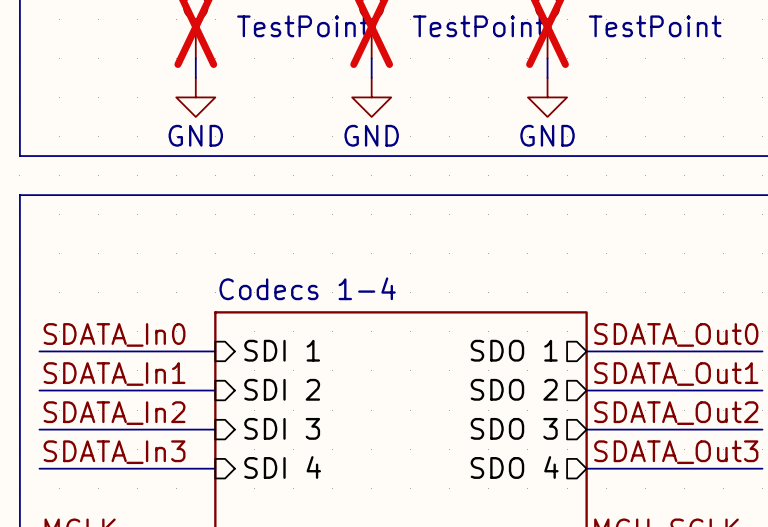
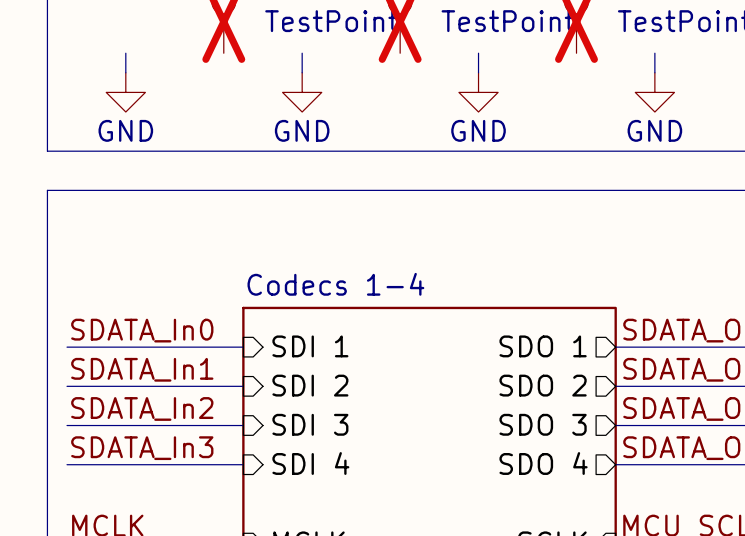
wire: none -> (125, 53) (125, 72)
wire: (195, 58) (195, 77) -> (302, 53) (302, 72)
wire: (371, 58) (371, 77) -> (478, 53) (478, 72)
wire: (547, 58) (547, 77) -> (654, 53) (654, 72)
power symbol: none -> GND (125, 92)
power symbol: GND (195, 97) -> none
power symbol: none -> GND (302, 92)
power symbol: GND (371, 97) -> none
power symbol: none -> GND (478, 92)
power symbol: GND (547, 97) -> none
power symbol: none -> GND (654, 92)

